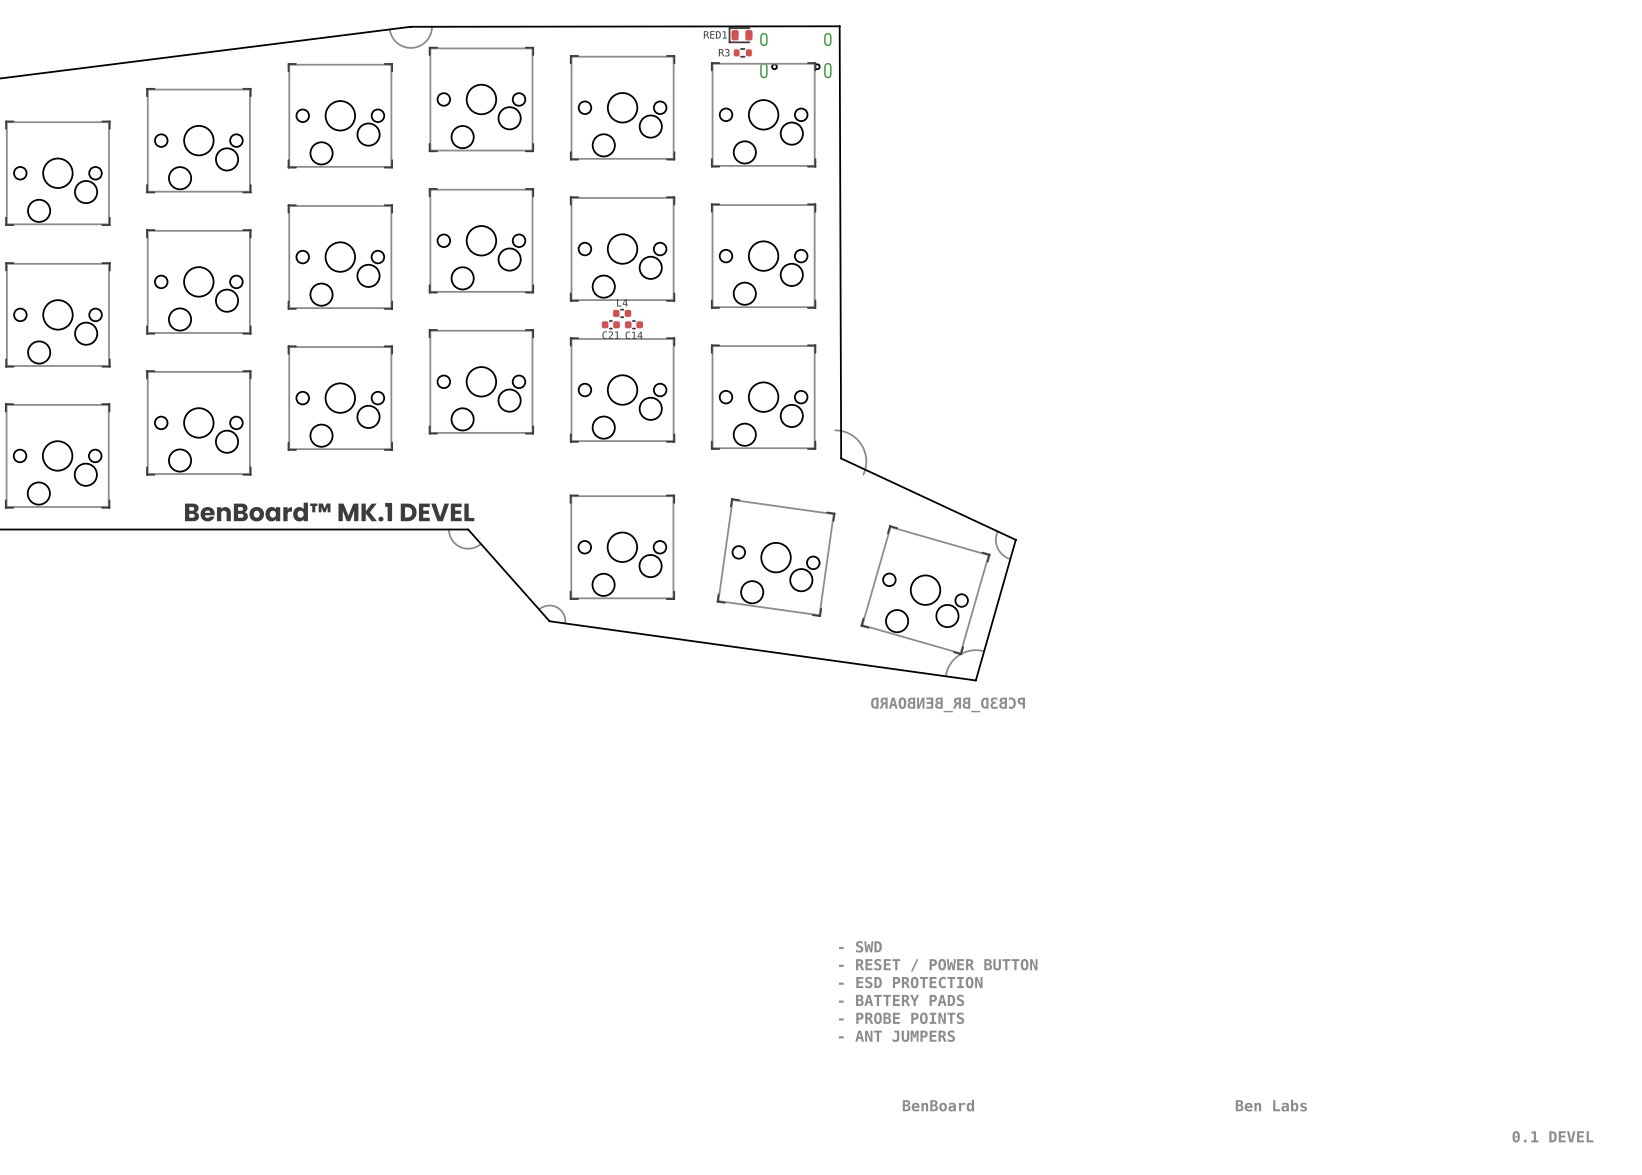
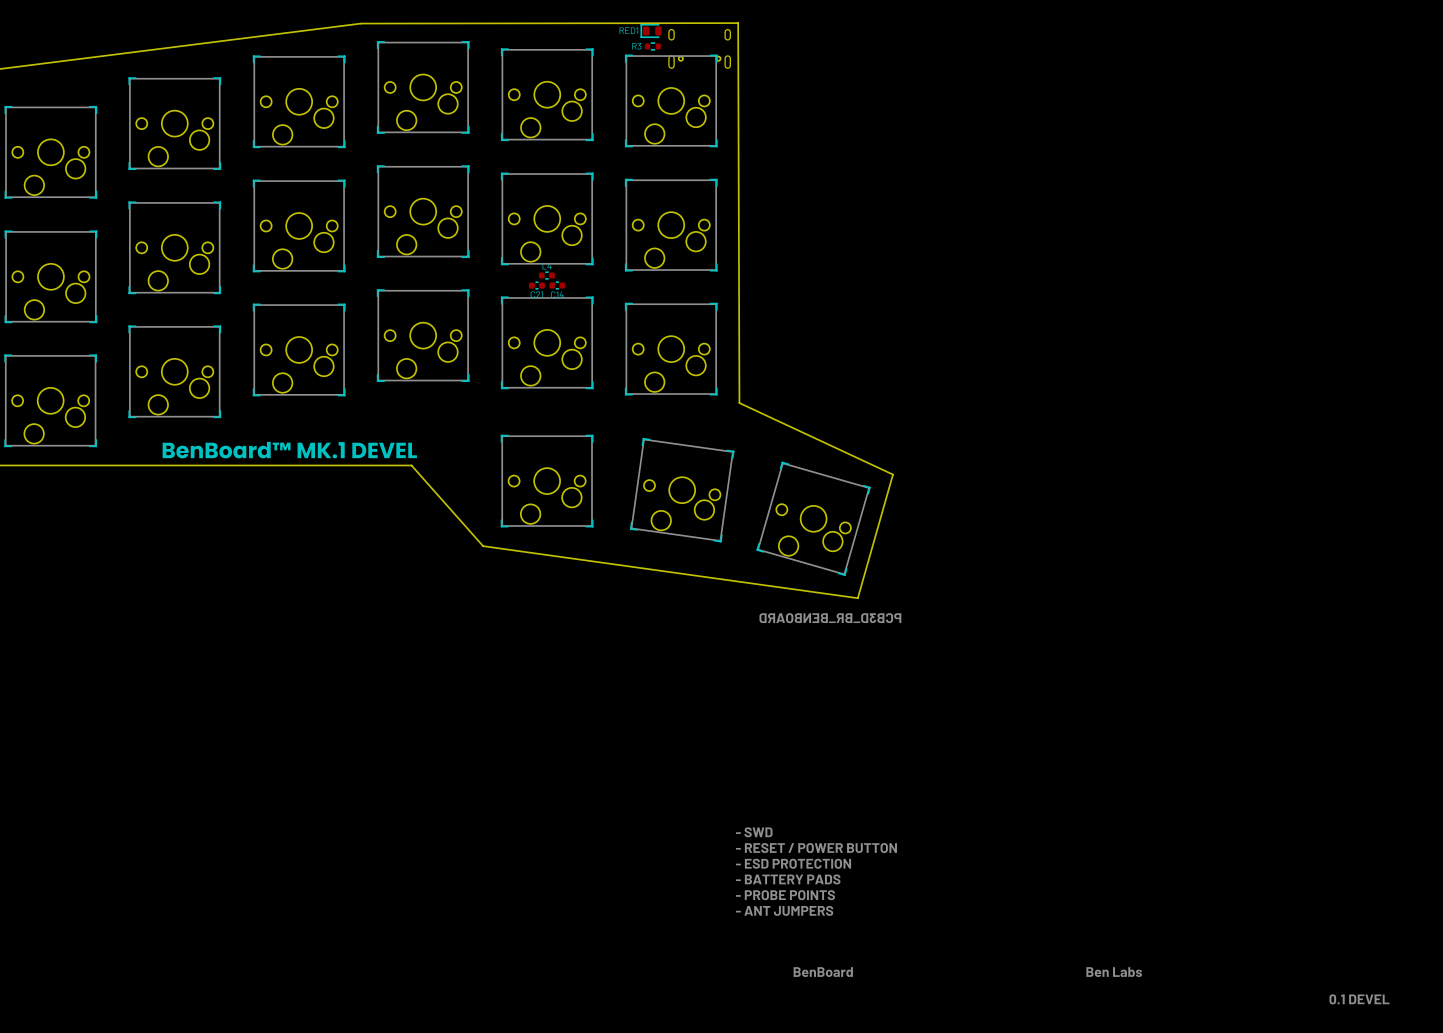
line: (432, 26) (426, 41) (412, 47) (397, 42) (389, 29) -> none
line: (835, 430) (850, 434) (861, 444) (866, 459) (863, 474) -> none
line: (448, 529) (451, 538) (460, 547) (472, 548) (480, 543) -> none
line: (997, 531) (995, 541) (997, 548) (1001, 554) (1010, 559) -> none
line: (539, 609) (547, 605) (557, 607) (563, 614) (565, 623) -> none
line: (984, 651) (969, 650) (959, 655) (951, 662) (945, 676) -> none

